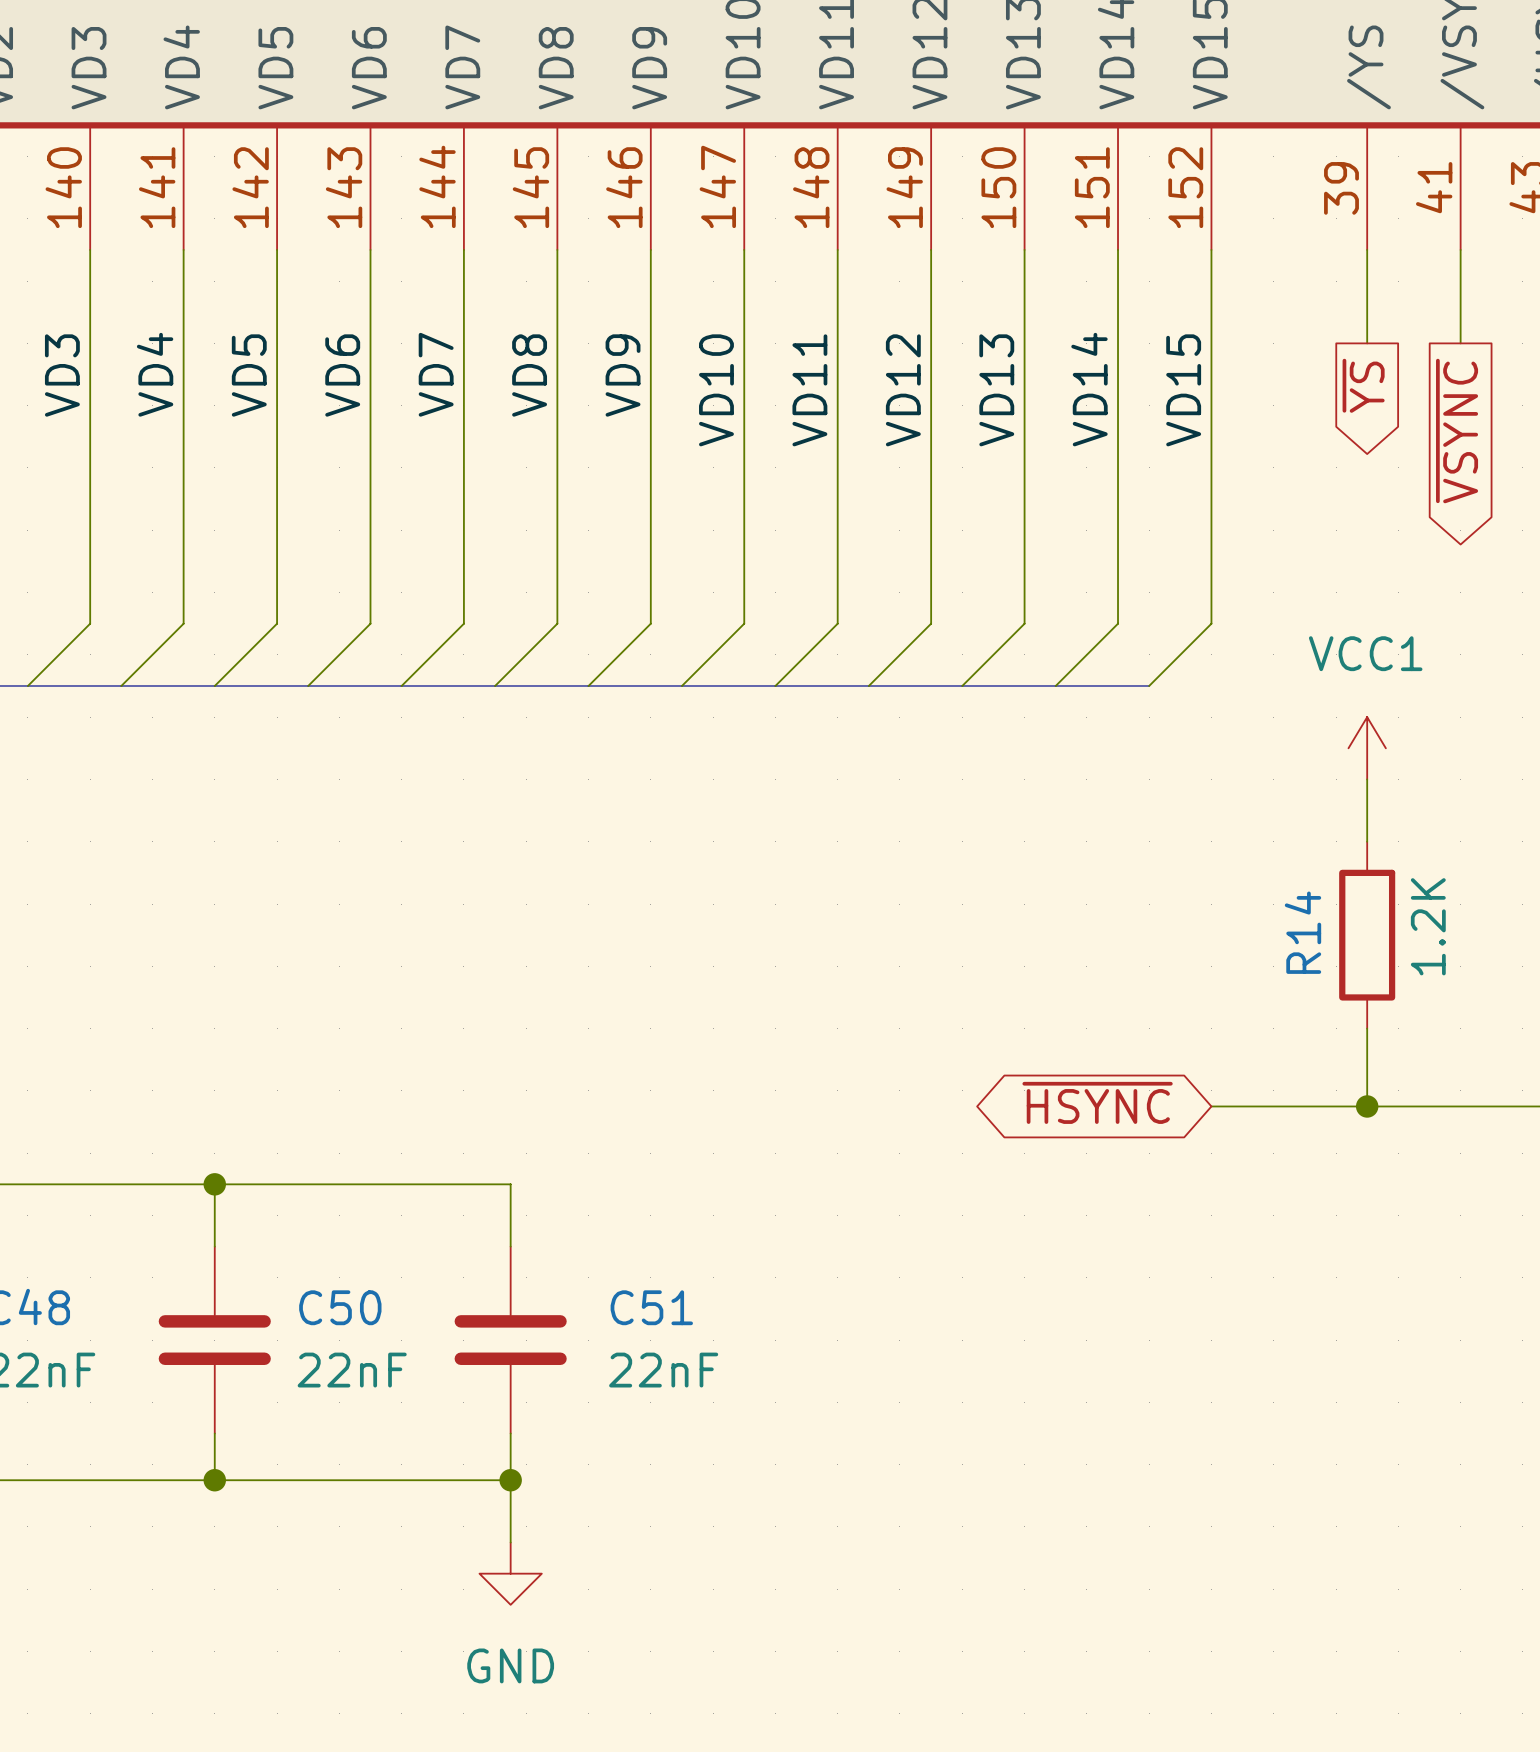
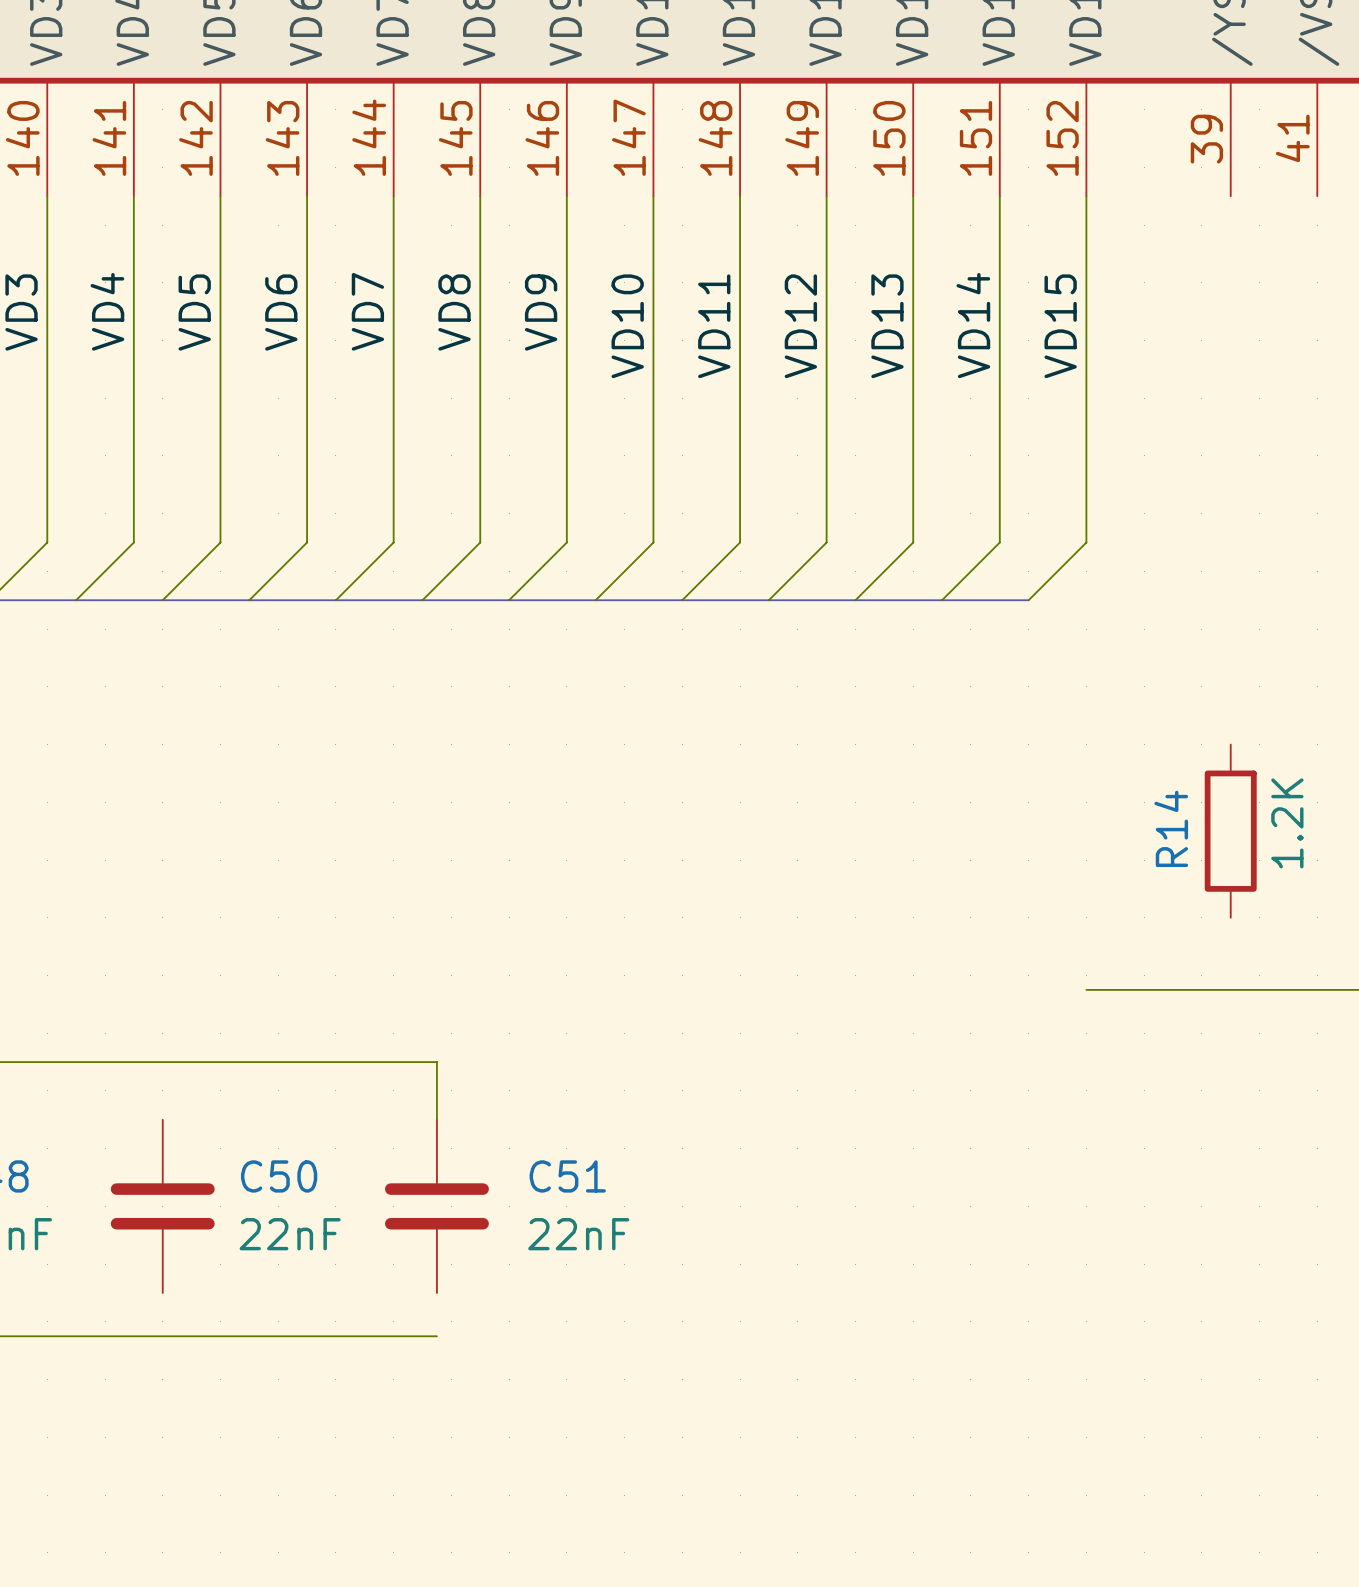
wire: (1367, 249) (1367, 343) -> none
wire: (1460, 249) (1460, 343) -> none
global label: ~{YS} (1363, 385) -> none
global label: ~{VSYNC} (1457, 431) -> none
power symbol: VCC1 (1367, 748) -> none
wire: (1367, 779) (1367, 841) -> none
wire: (1367, 1028) (1367, 1106) -> none
global label: ~{HSYNC} (1097, 1102) -> none
junction: (1367, 1106) -> none
wire: (214, 1184) (214, 1246) -> none
junction: (214, 1184) -> none
wire: (214, 1433) (214, 1480) -> none
wire: (510, 1433) (510, 1542) -> none
junction: (214, 1480) -> none
junction: (510, 1480) -> none
power symbol: GND (510, 1573) -> none

